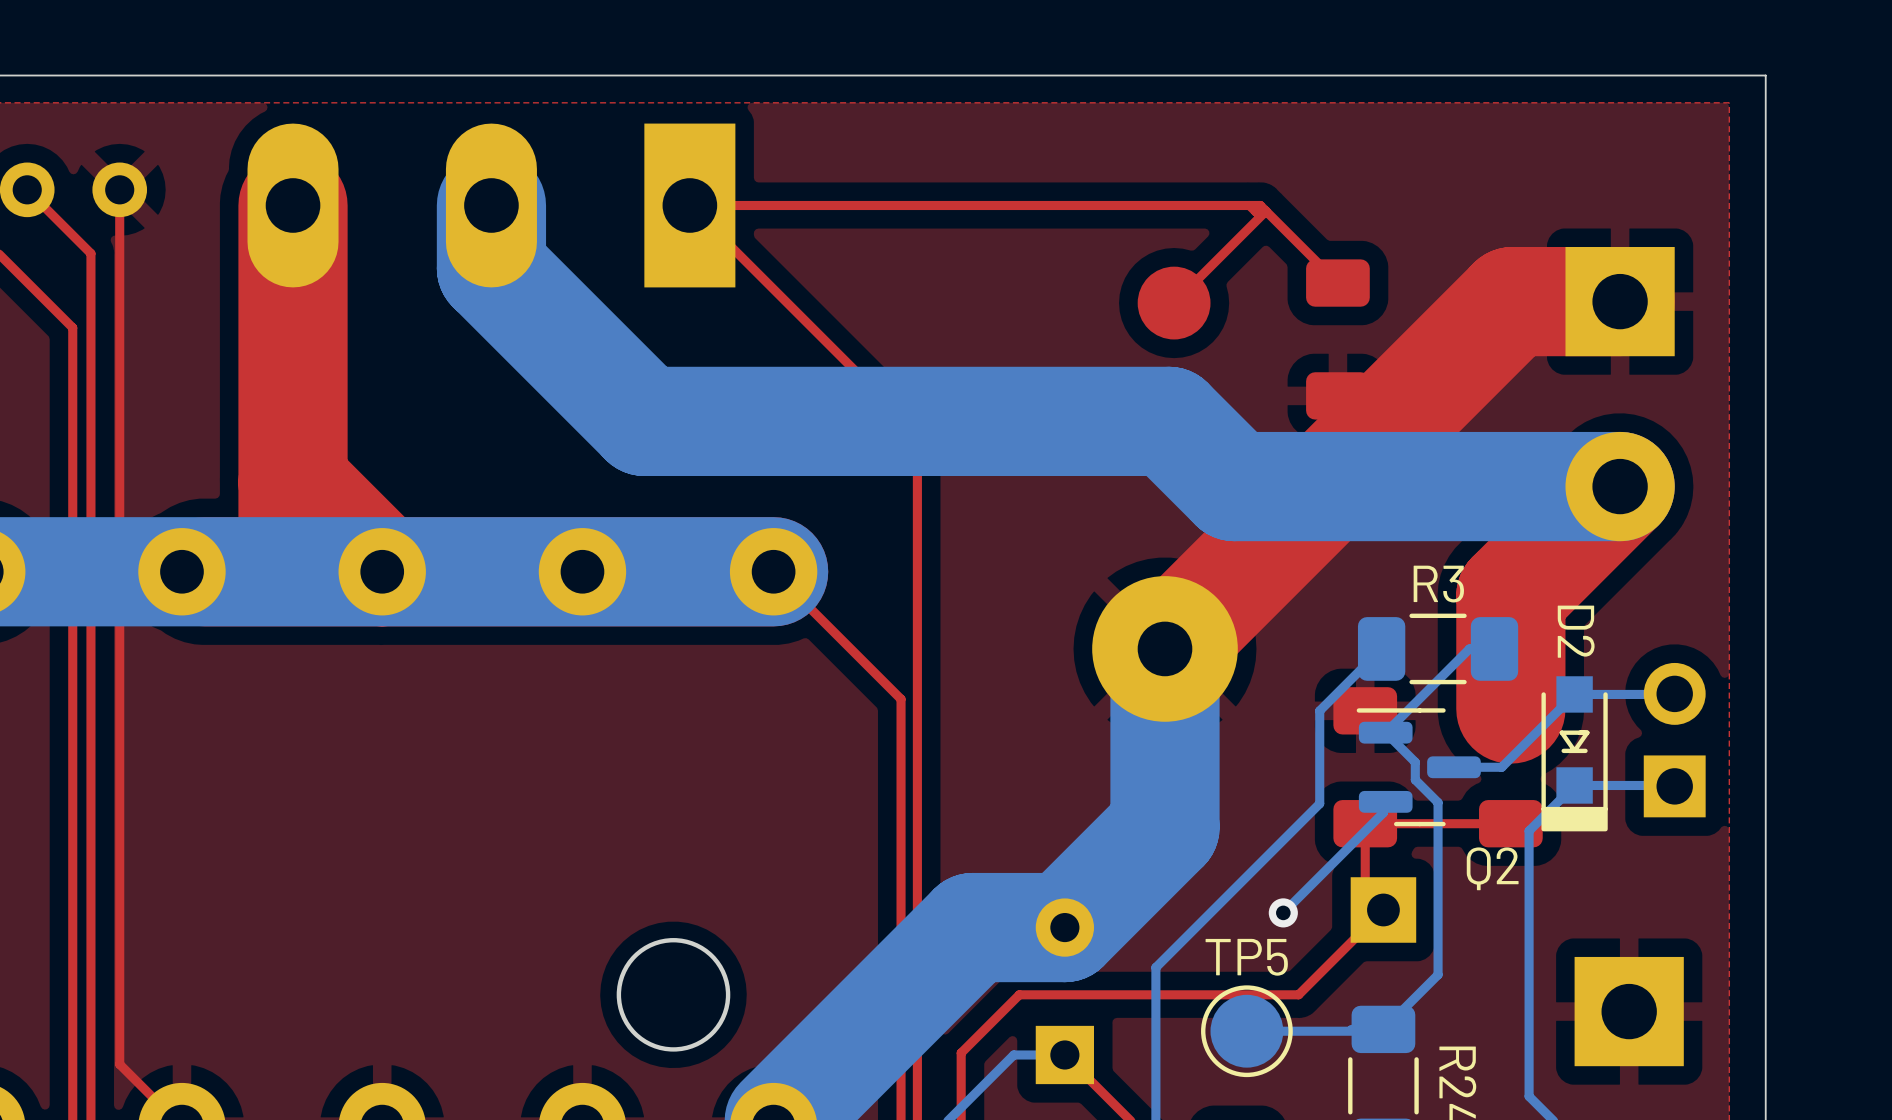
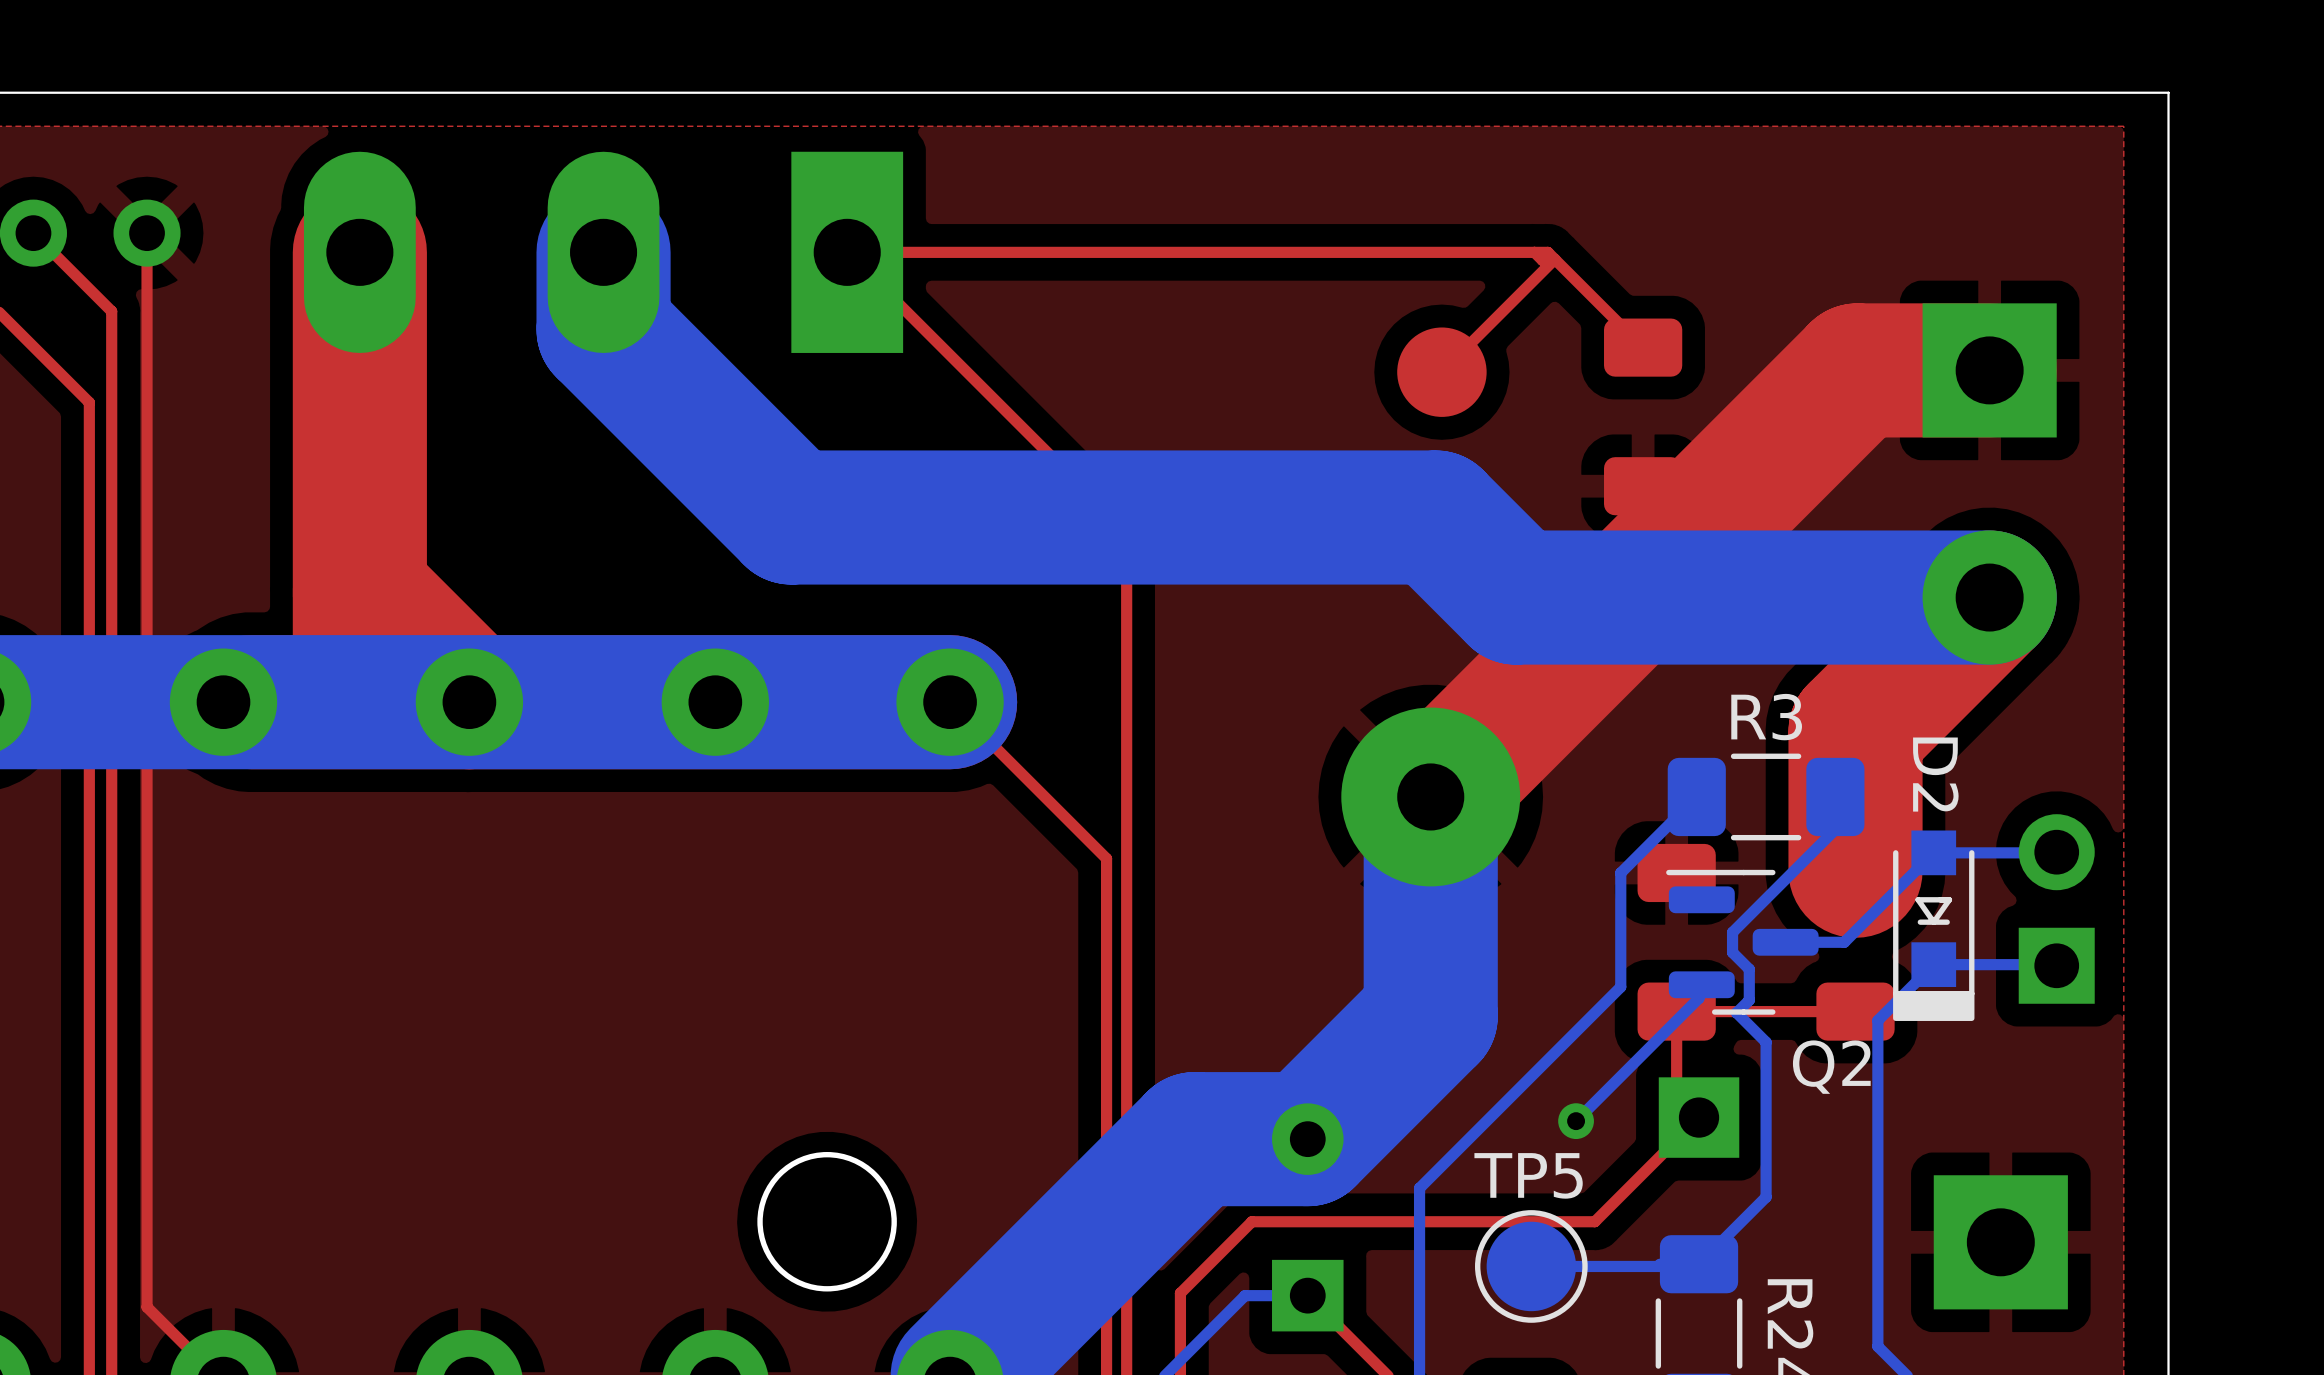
bottom track: (1494, 648) (1469, 648) (1385, 732) (1415, 762) (1415, 779) -> (1835, 796) (1835, 829) (1732, 932) (1732, 952) (1738, 957)
bottom track: (1424, 789) (1438, 802) (1438, 848) -> (1749, 969) (1749, 1000) (1736, 1012)
bottom track: none -> (1736, 1012) (1766, 1042)

